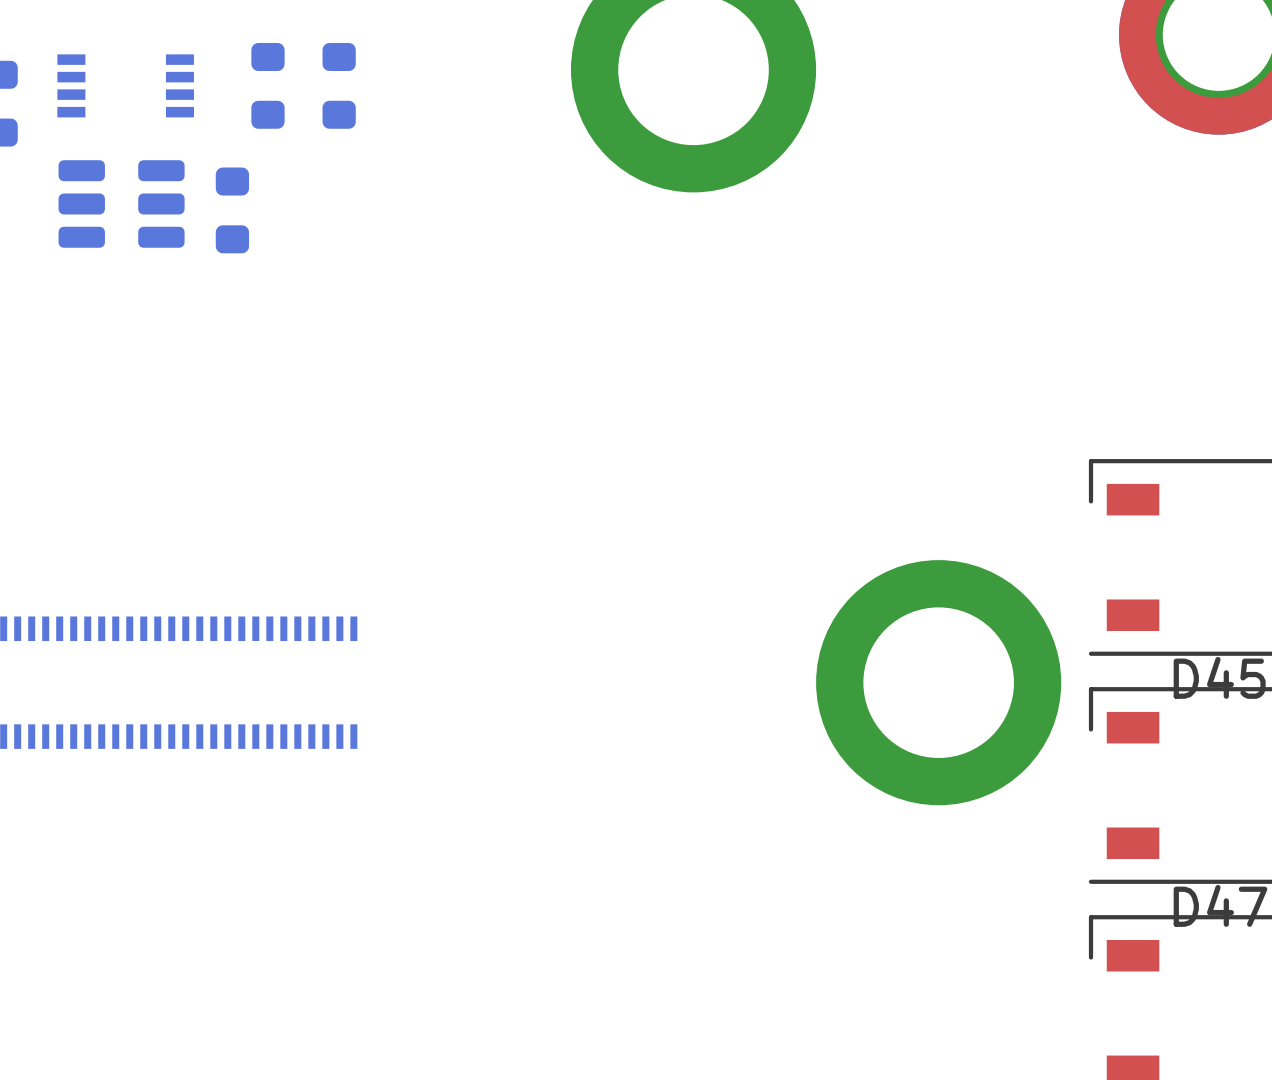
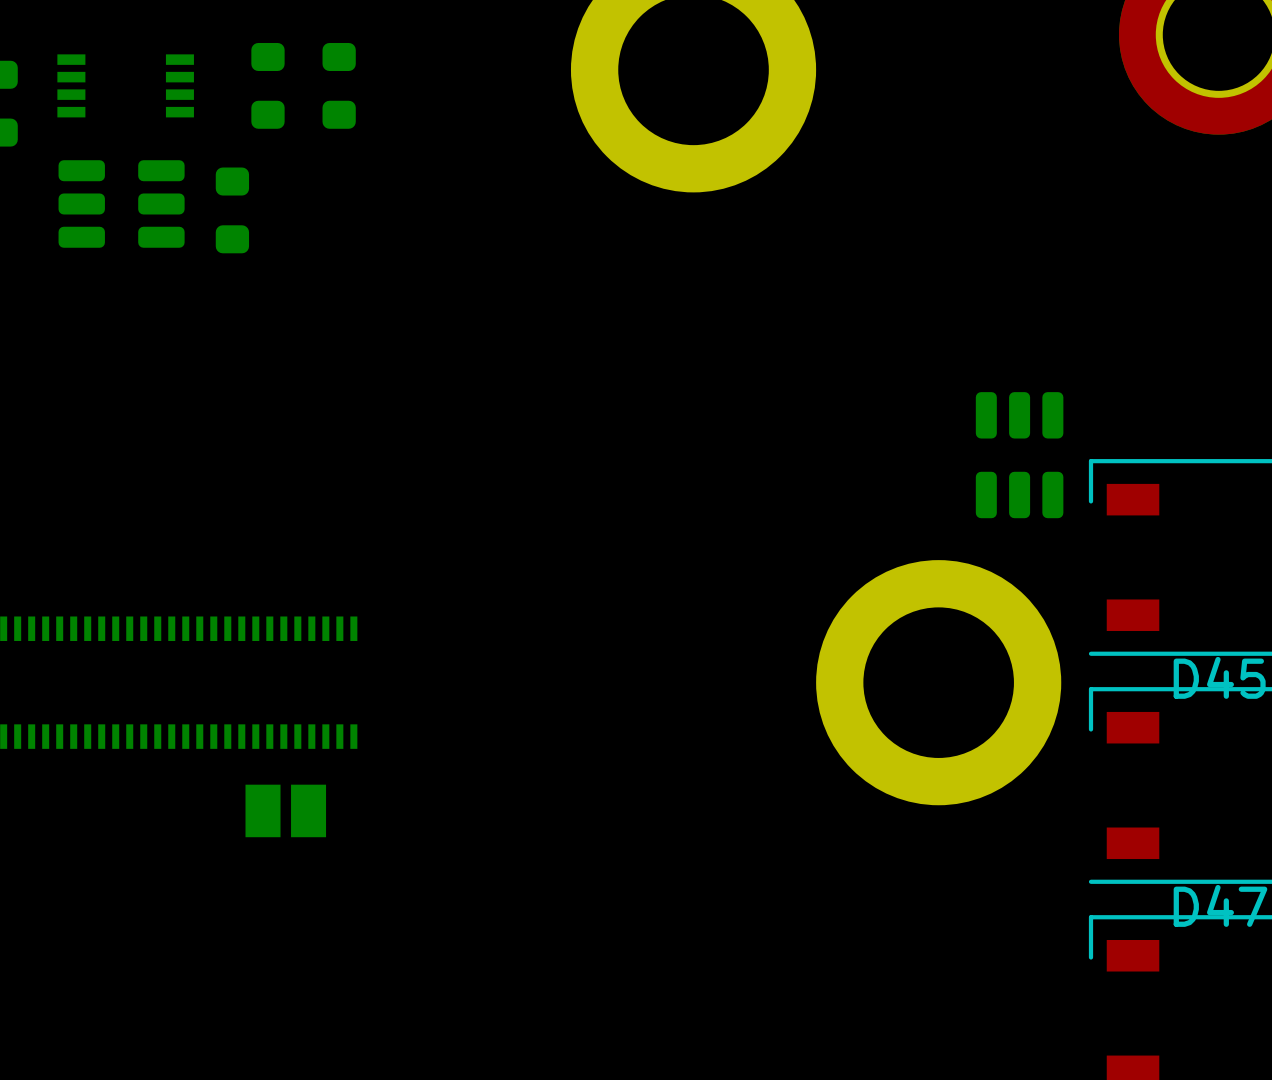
part: none -> (1019, 455)
part: none -> (285, 810)

